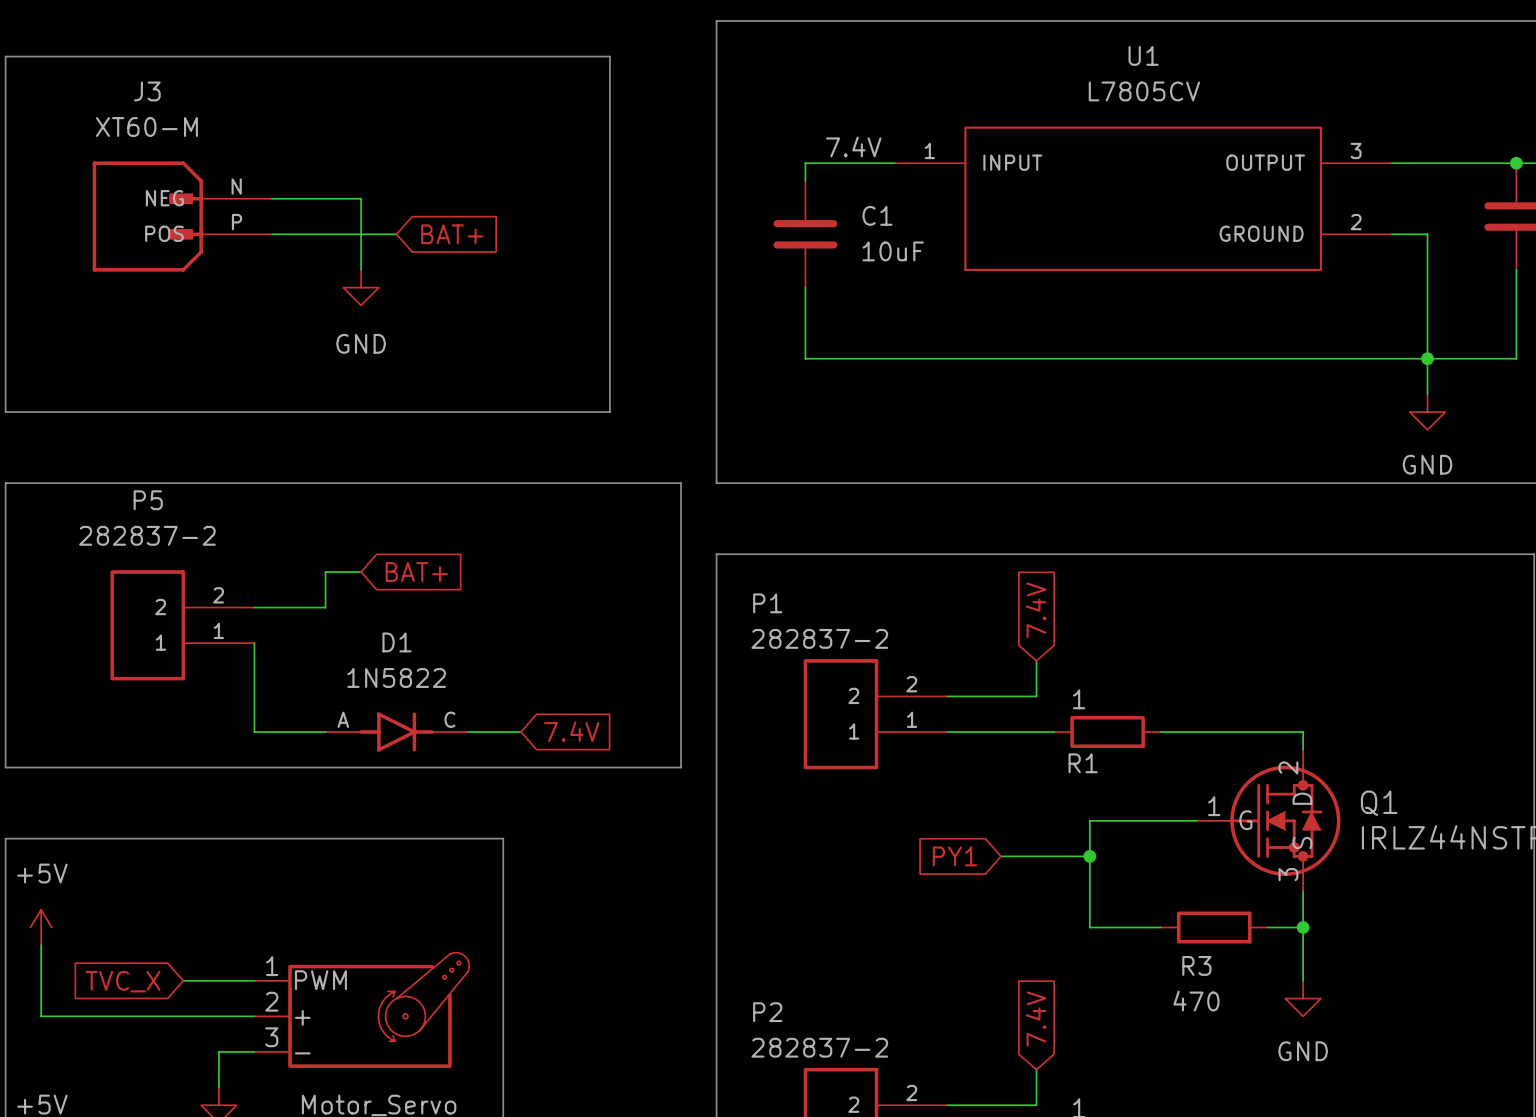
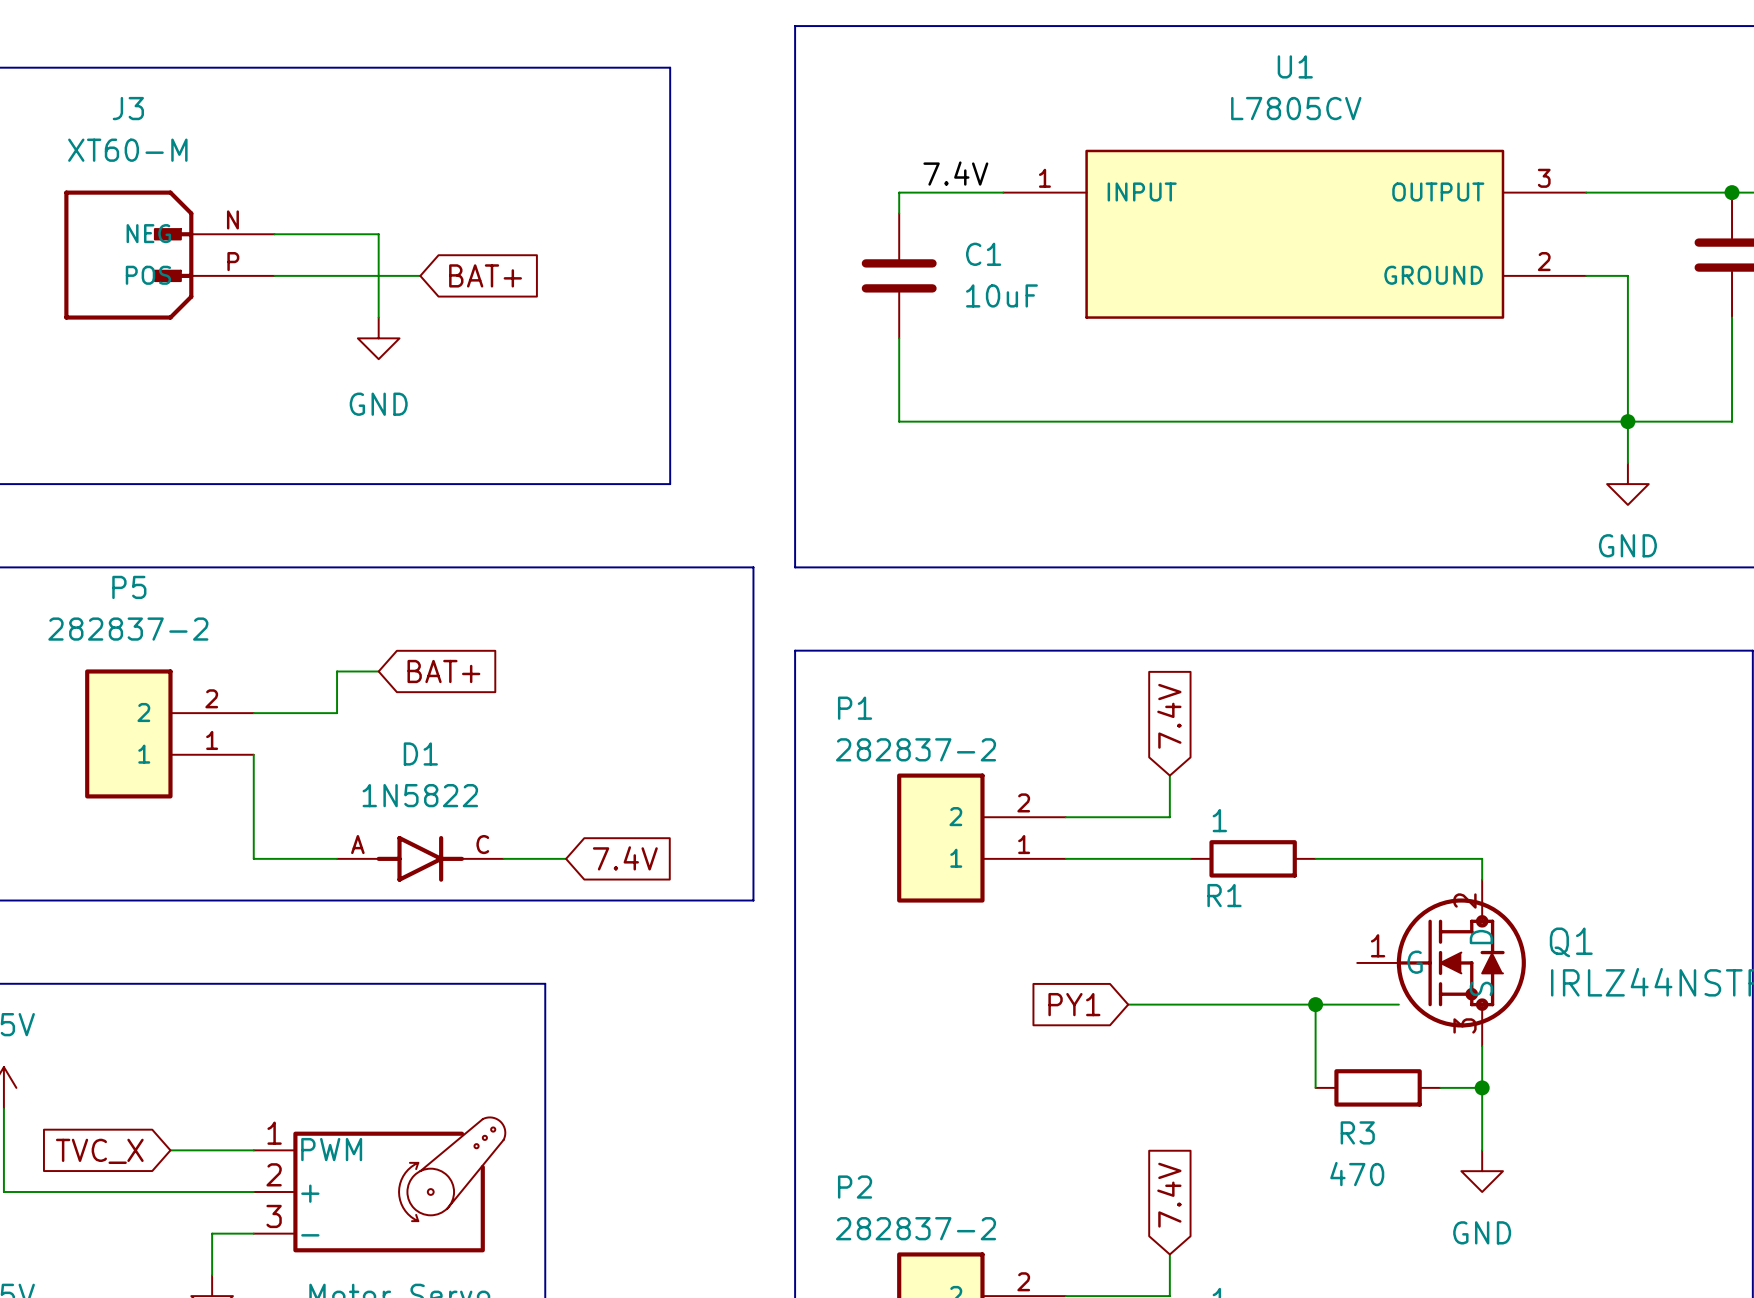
wire: (1196, 820) (1089, 820) (1089, 927) (1160, 927) -> (1315, 1004) (1315, 1087)
wire: none -> (1232, 1004) (1398, 1004)
junction position: (1089, 856) -> (1315, 1004)

